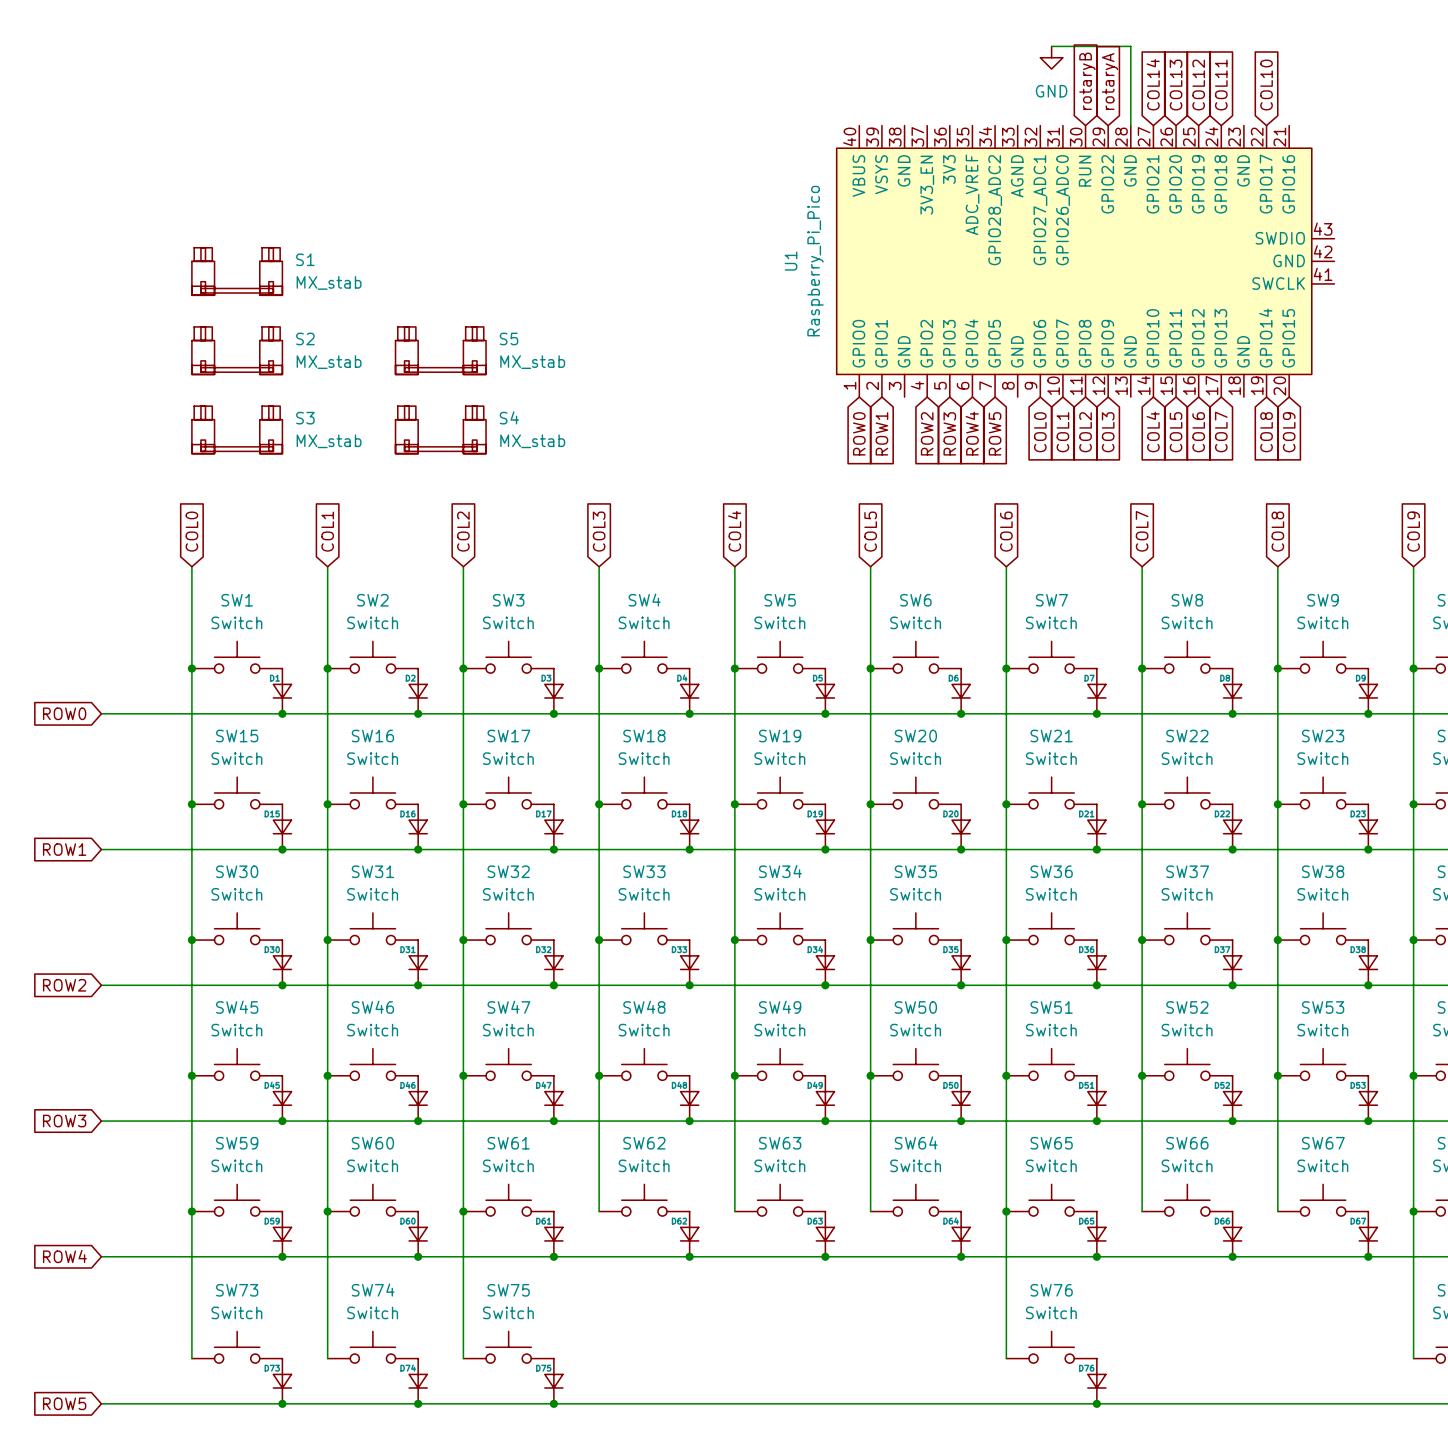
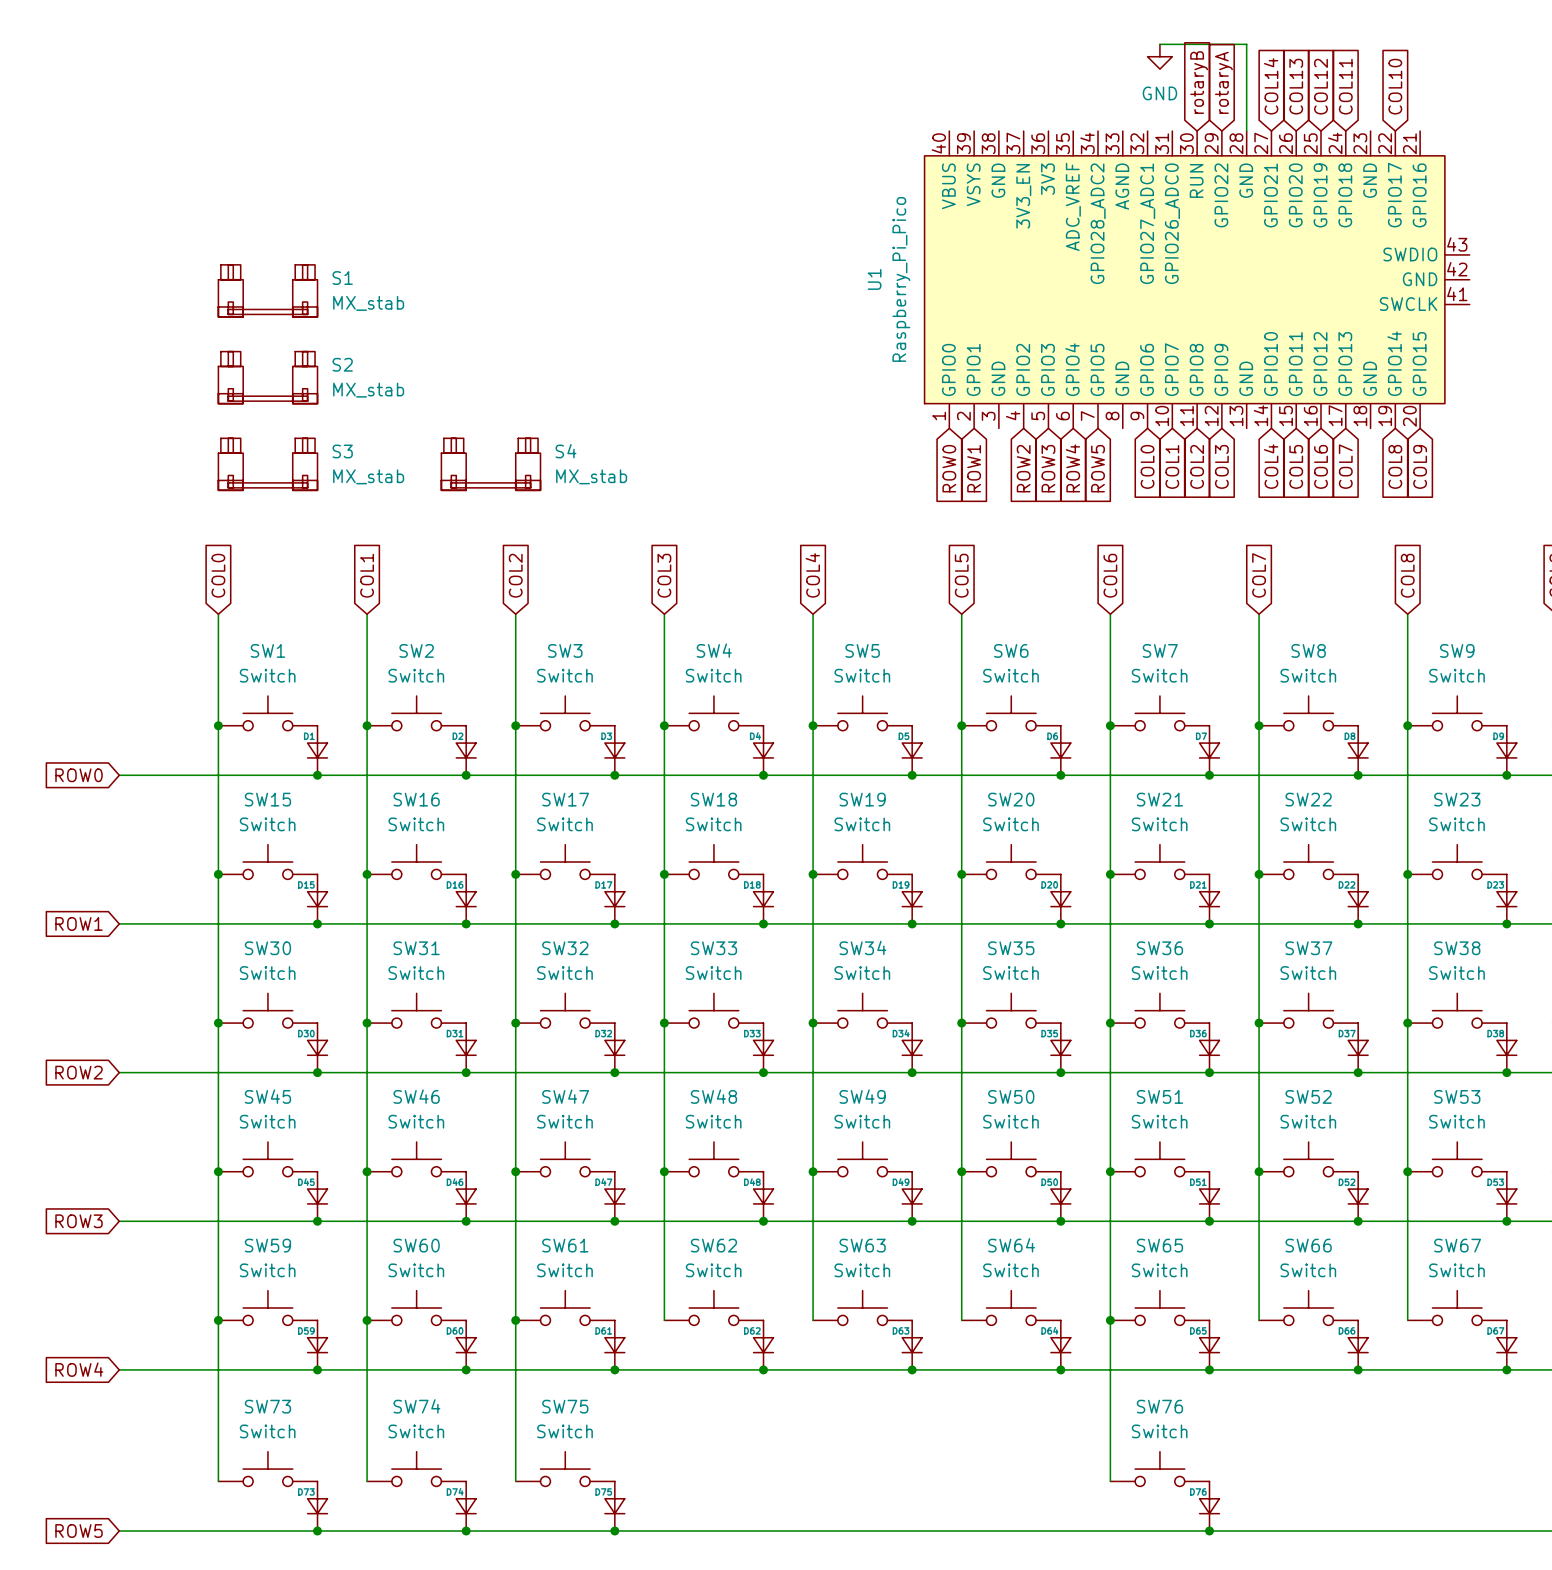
S5: MX_stab (440, 350) -> none

